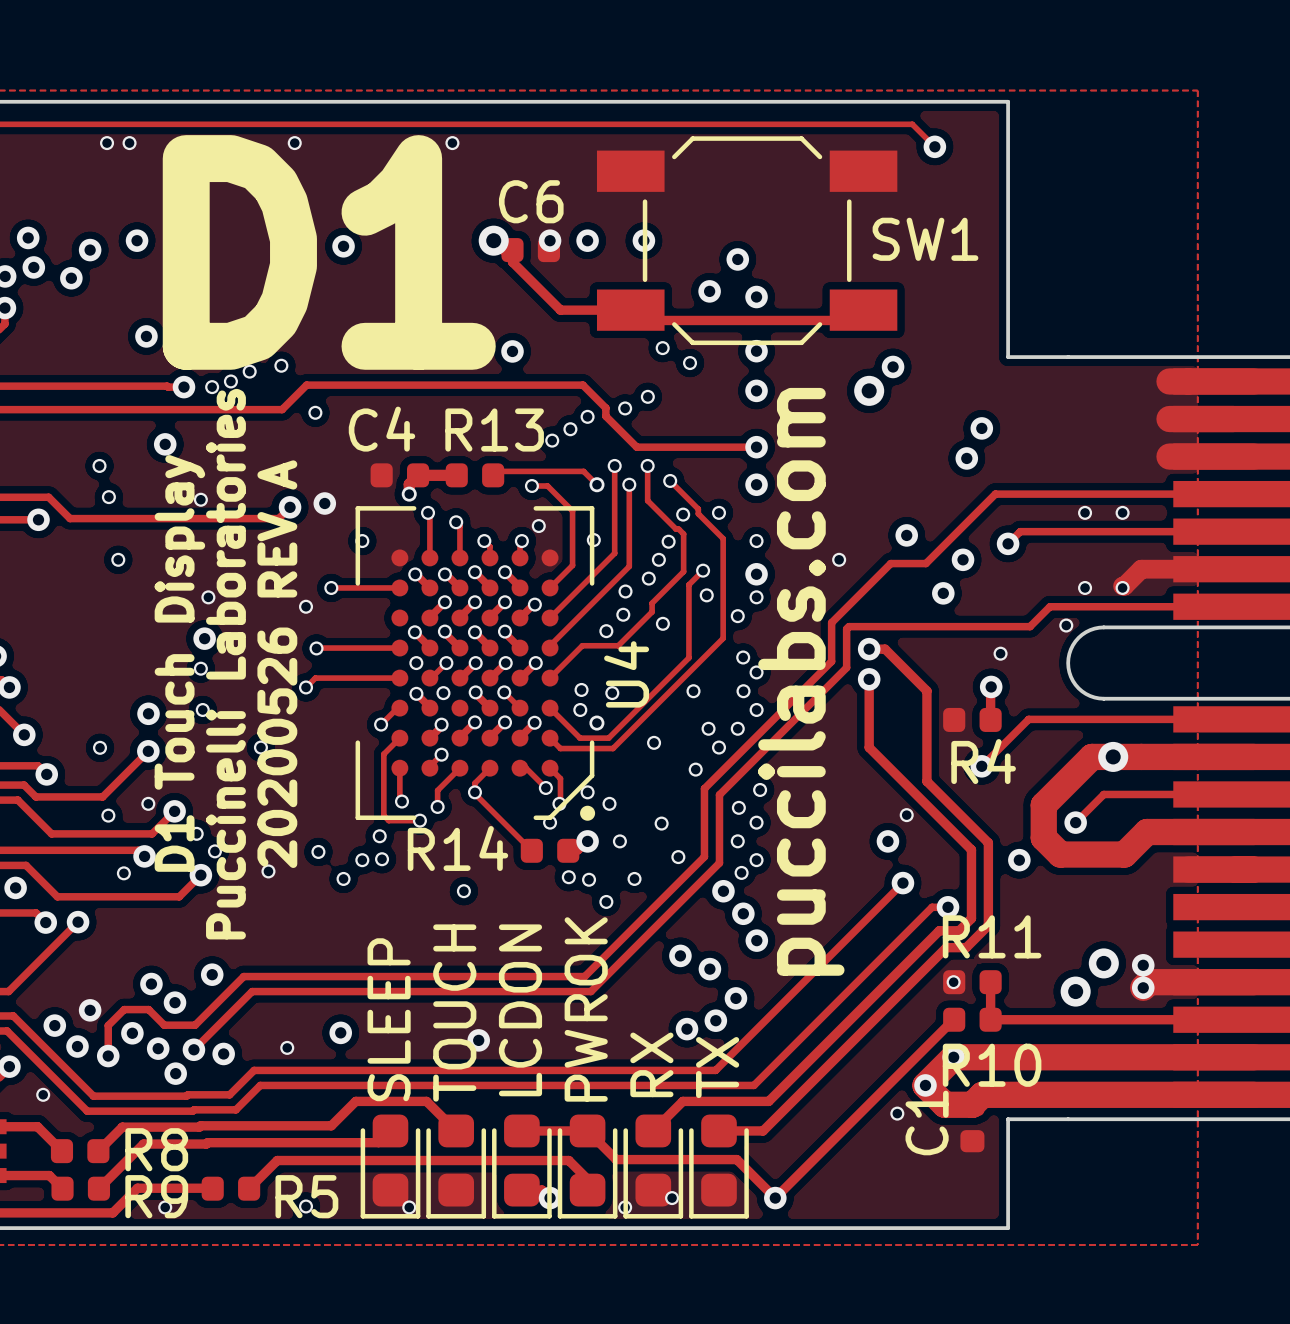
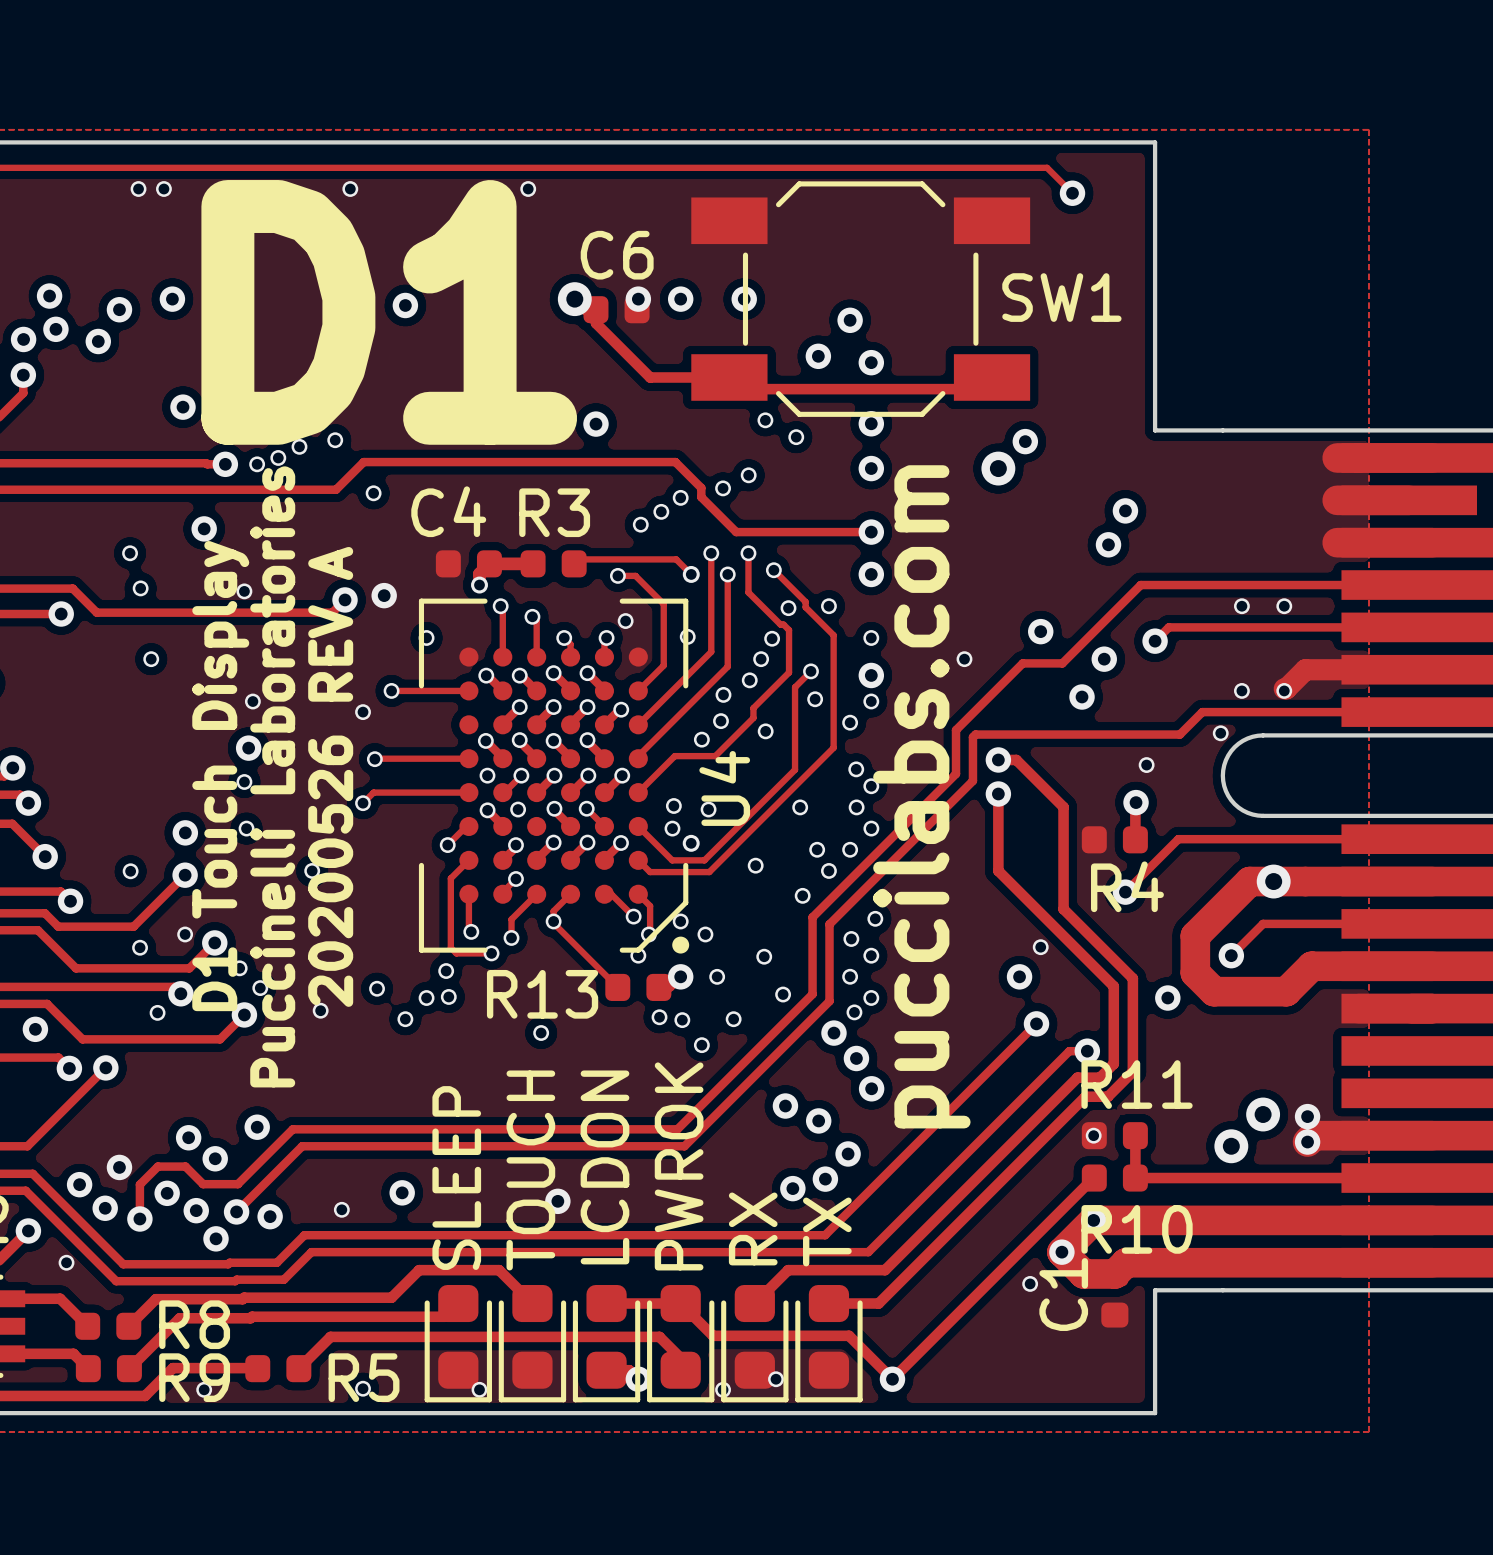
R13 name: R13 (494, 430) -> R3 (554, 512)
R14 name: R14 (457, 848) -> R13 (542, 994)

